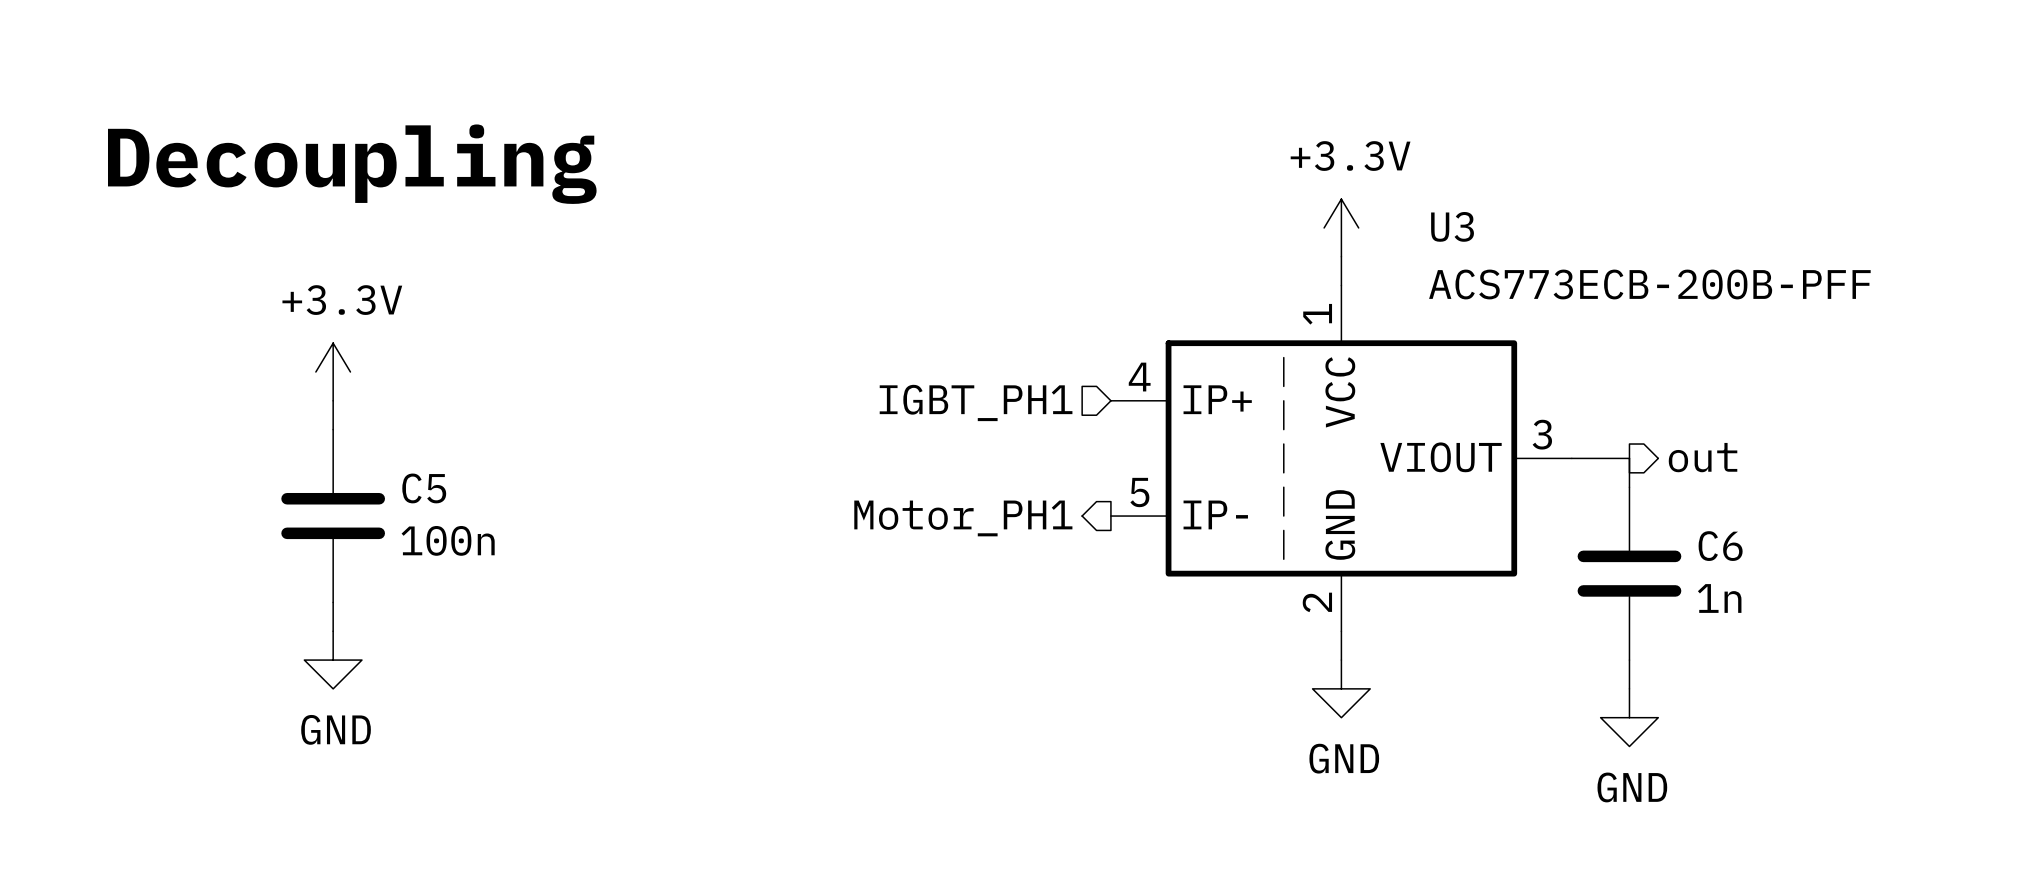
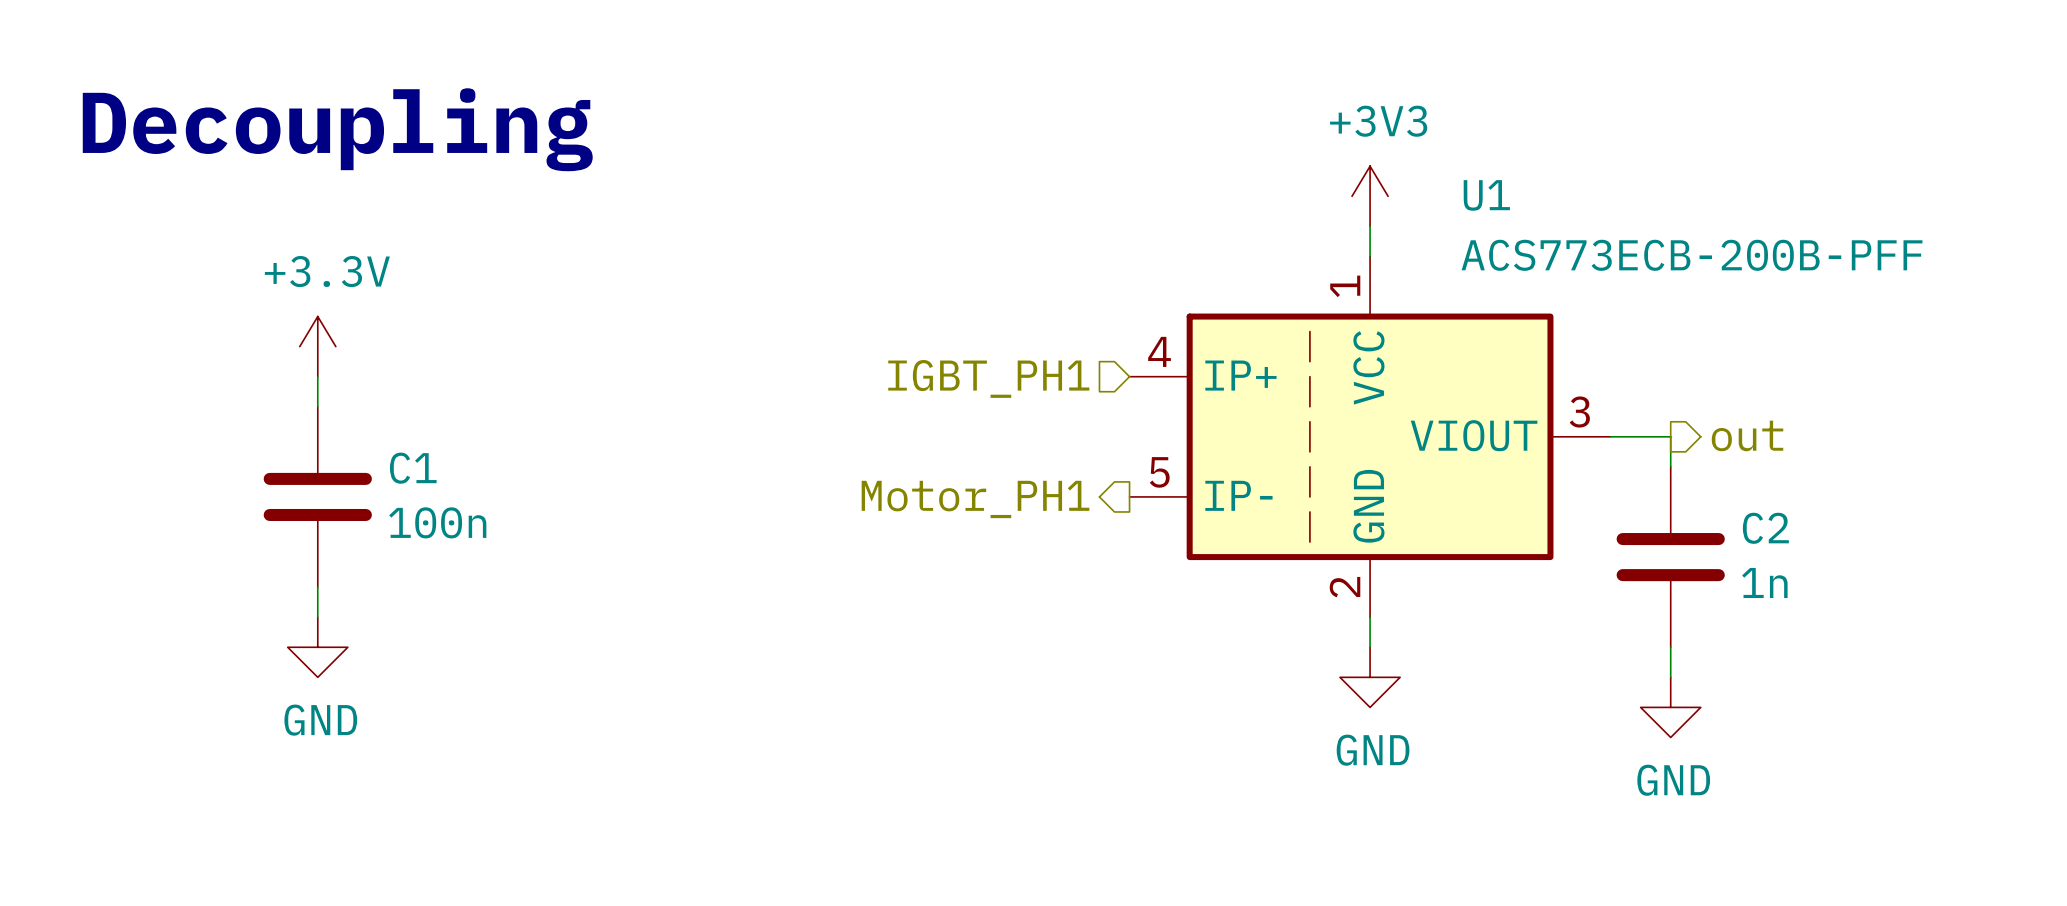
U3 name: U3 (1452, 226) -> U1 (1486, 195)
power symbol: +3.3V (1341, 227) -> +3V3 (1370, 196)
C5 name: C5 (424, 488) -> C1 (413, 468)
C6 name: C6 (1720, 546) -> C2 (1765, 528)

